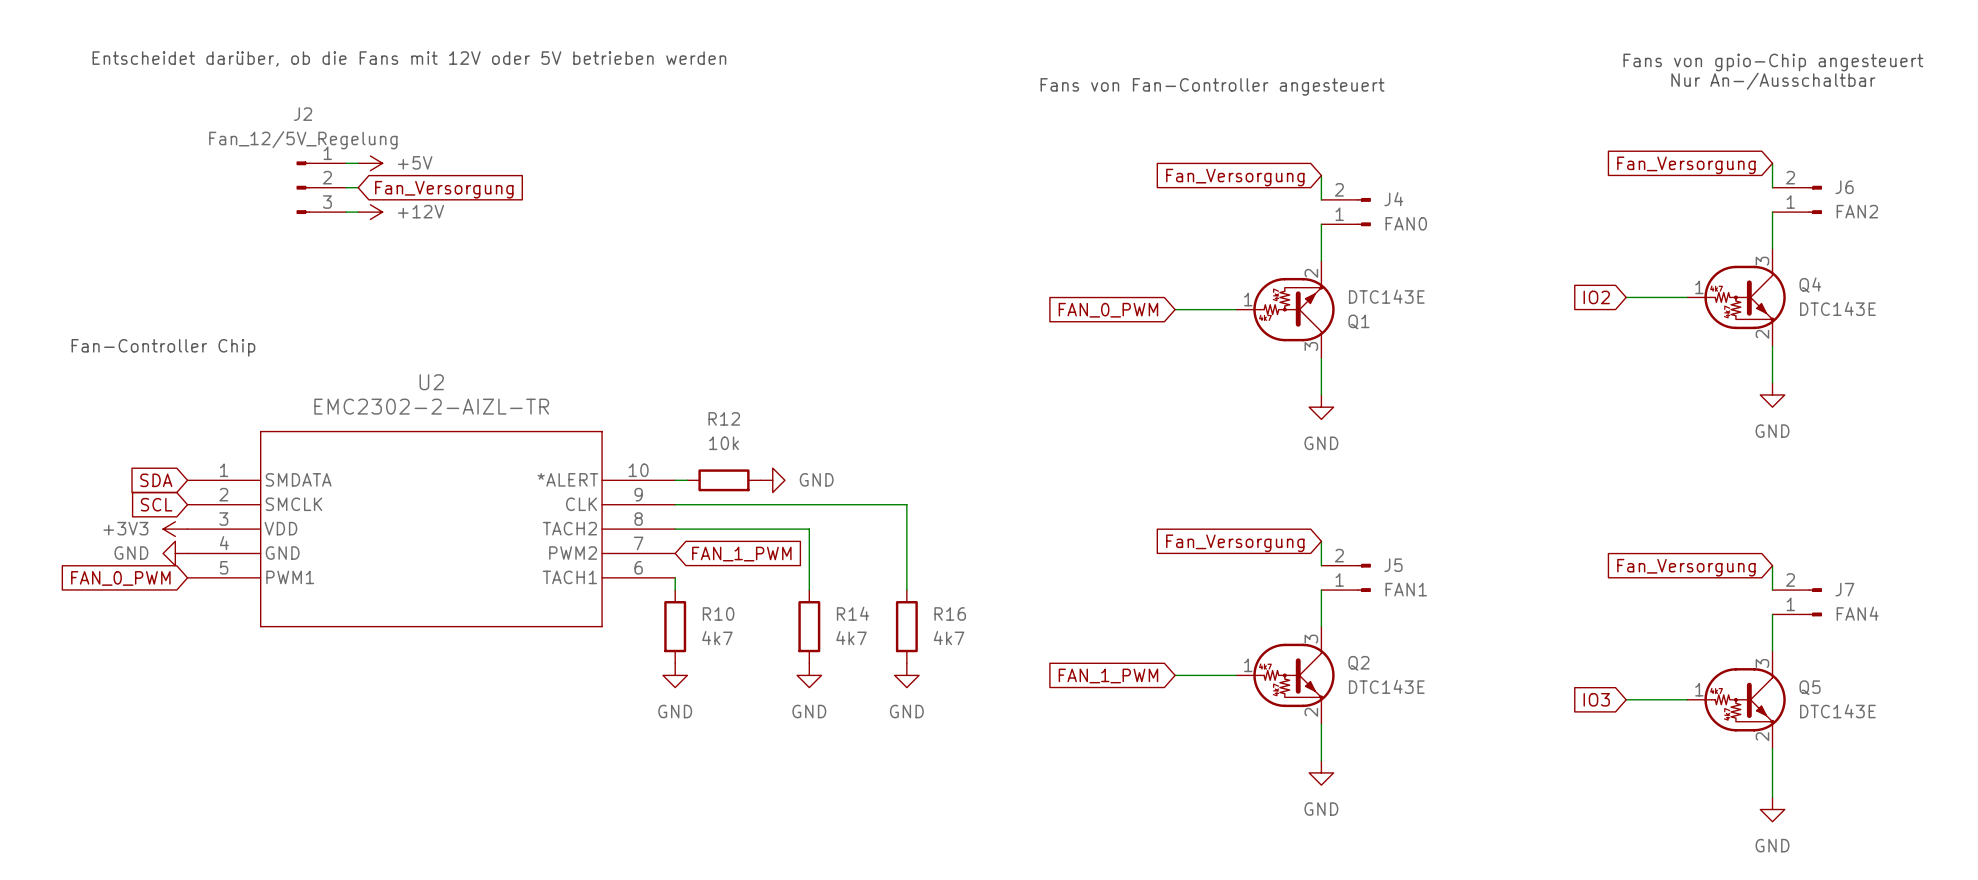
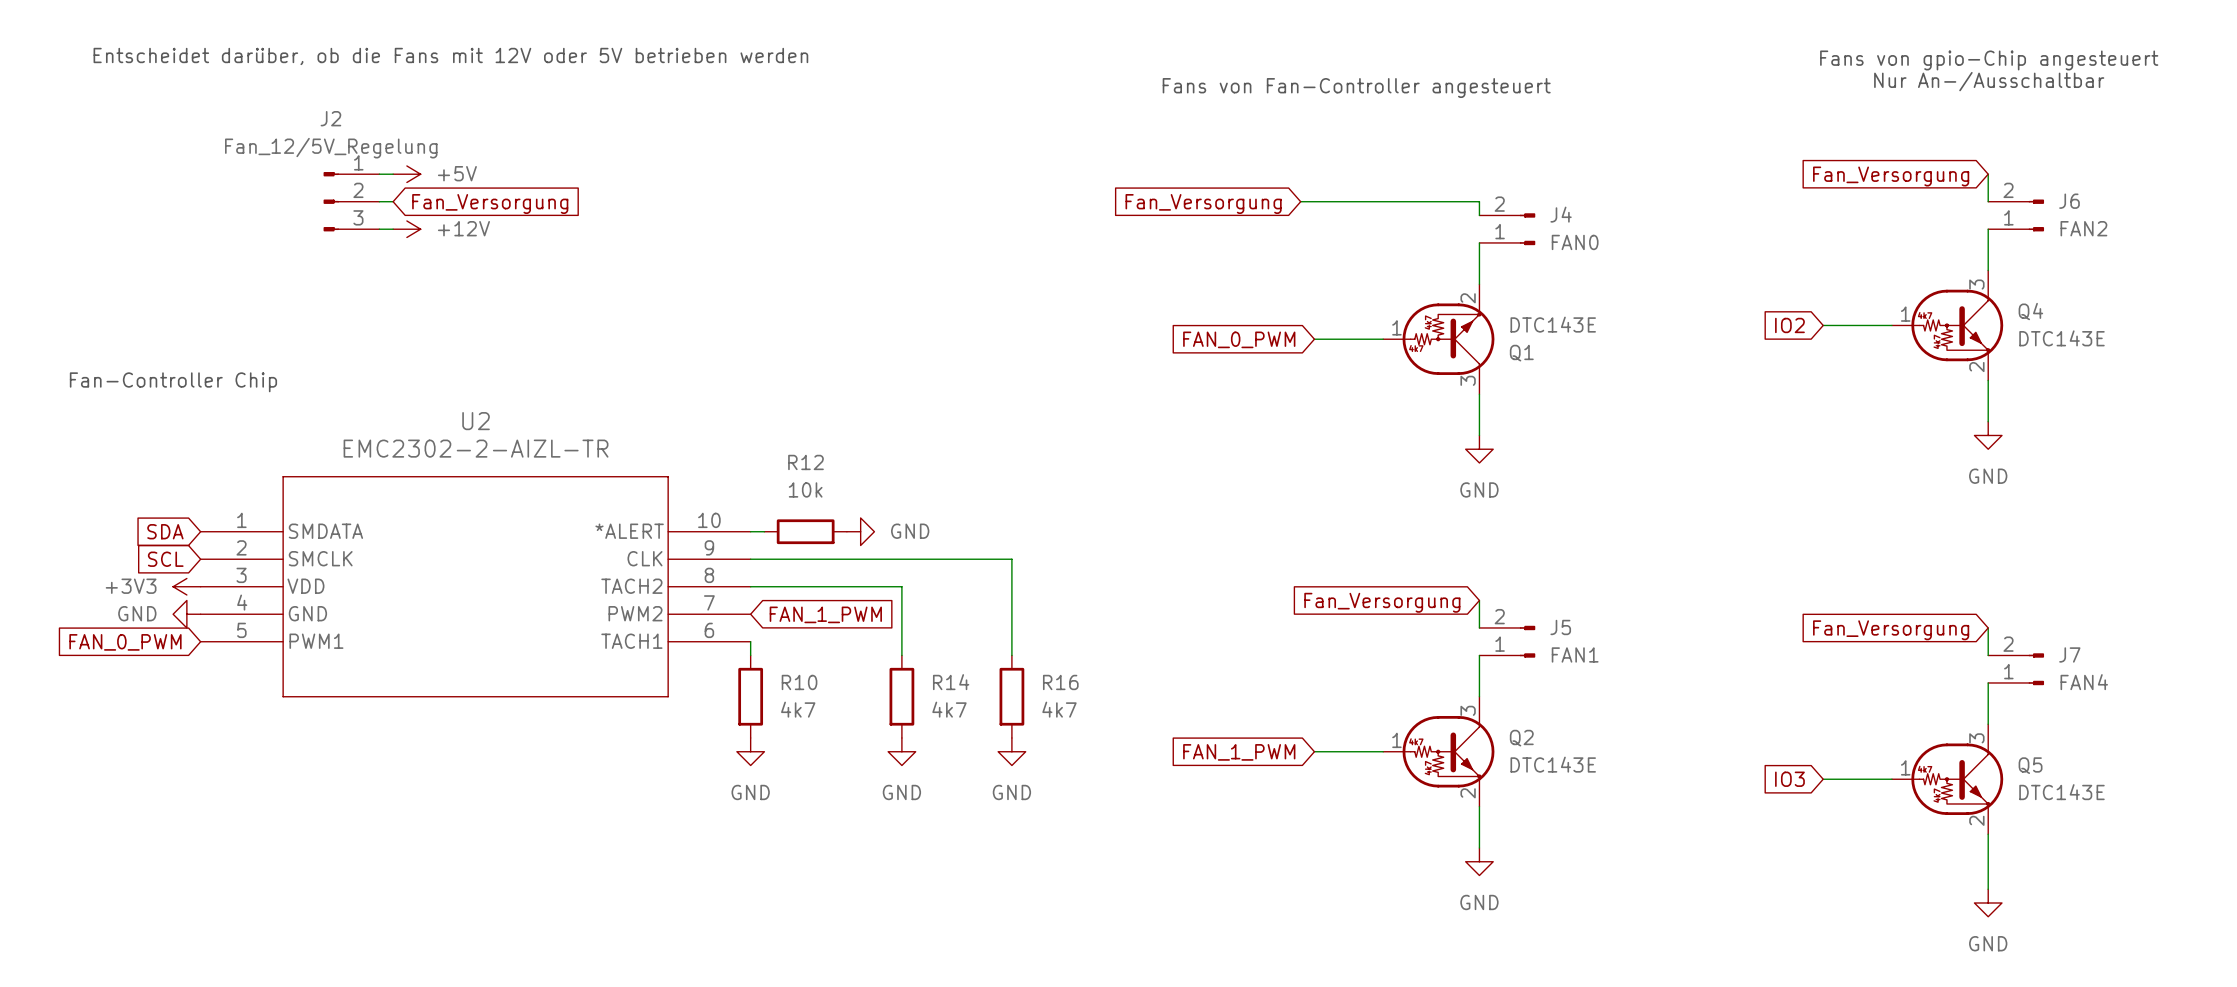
wire: (1321, 175) (1321, 187) -> (1300, 201) (1479, 201)
global label position: Fan_Versorgung (1235, 177) -> Fan_Versorgung (1203, 204)

